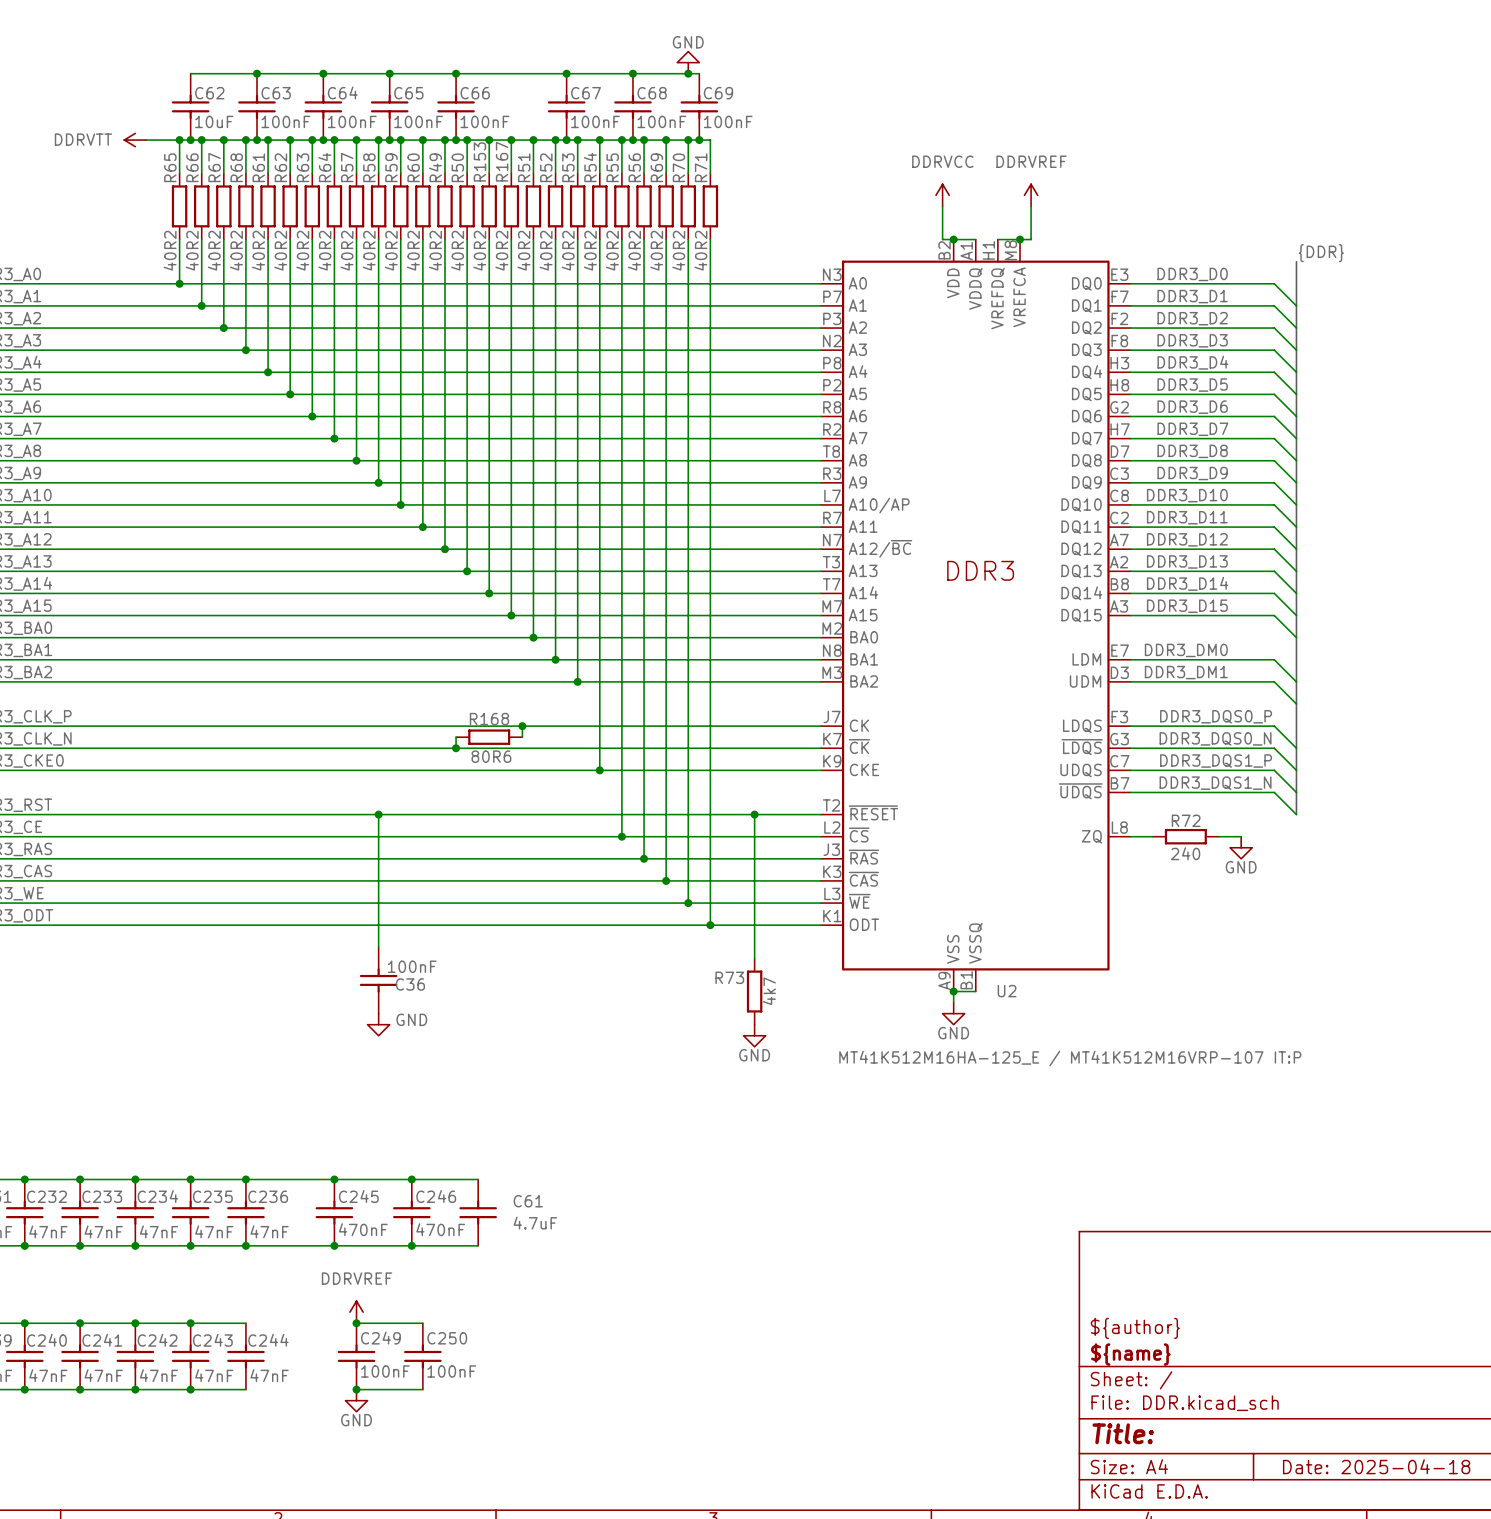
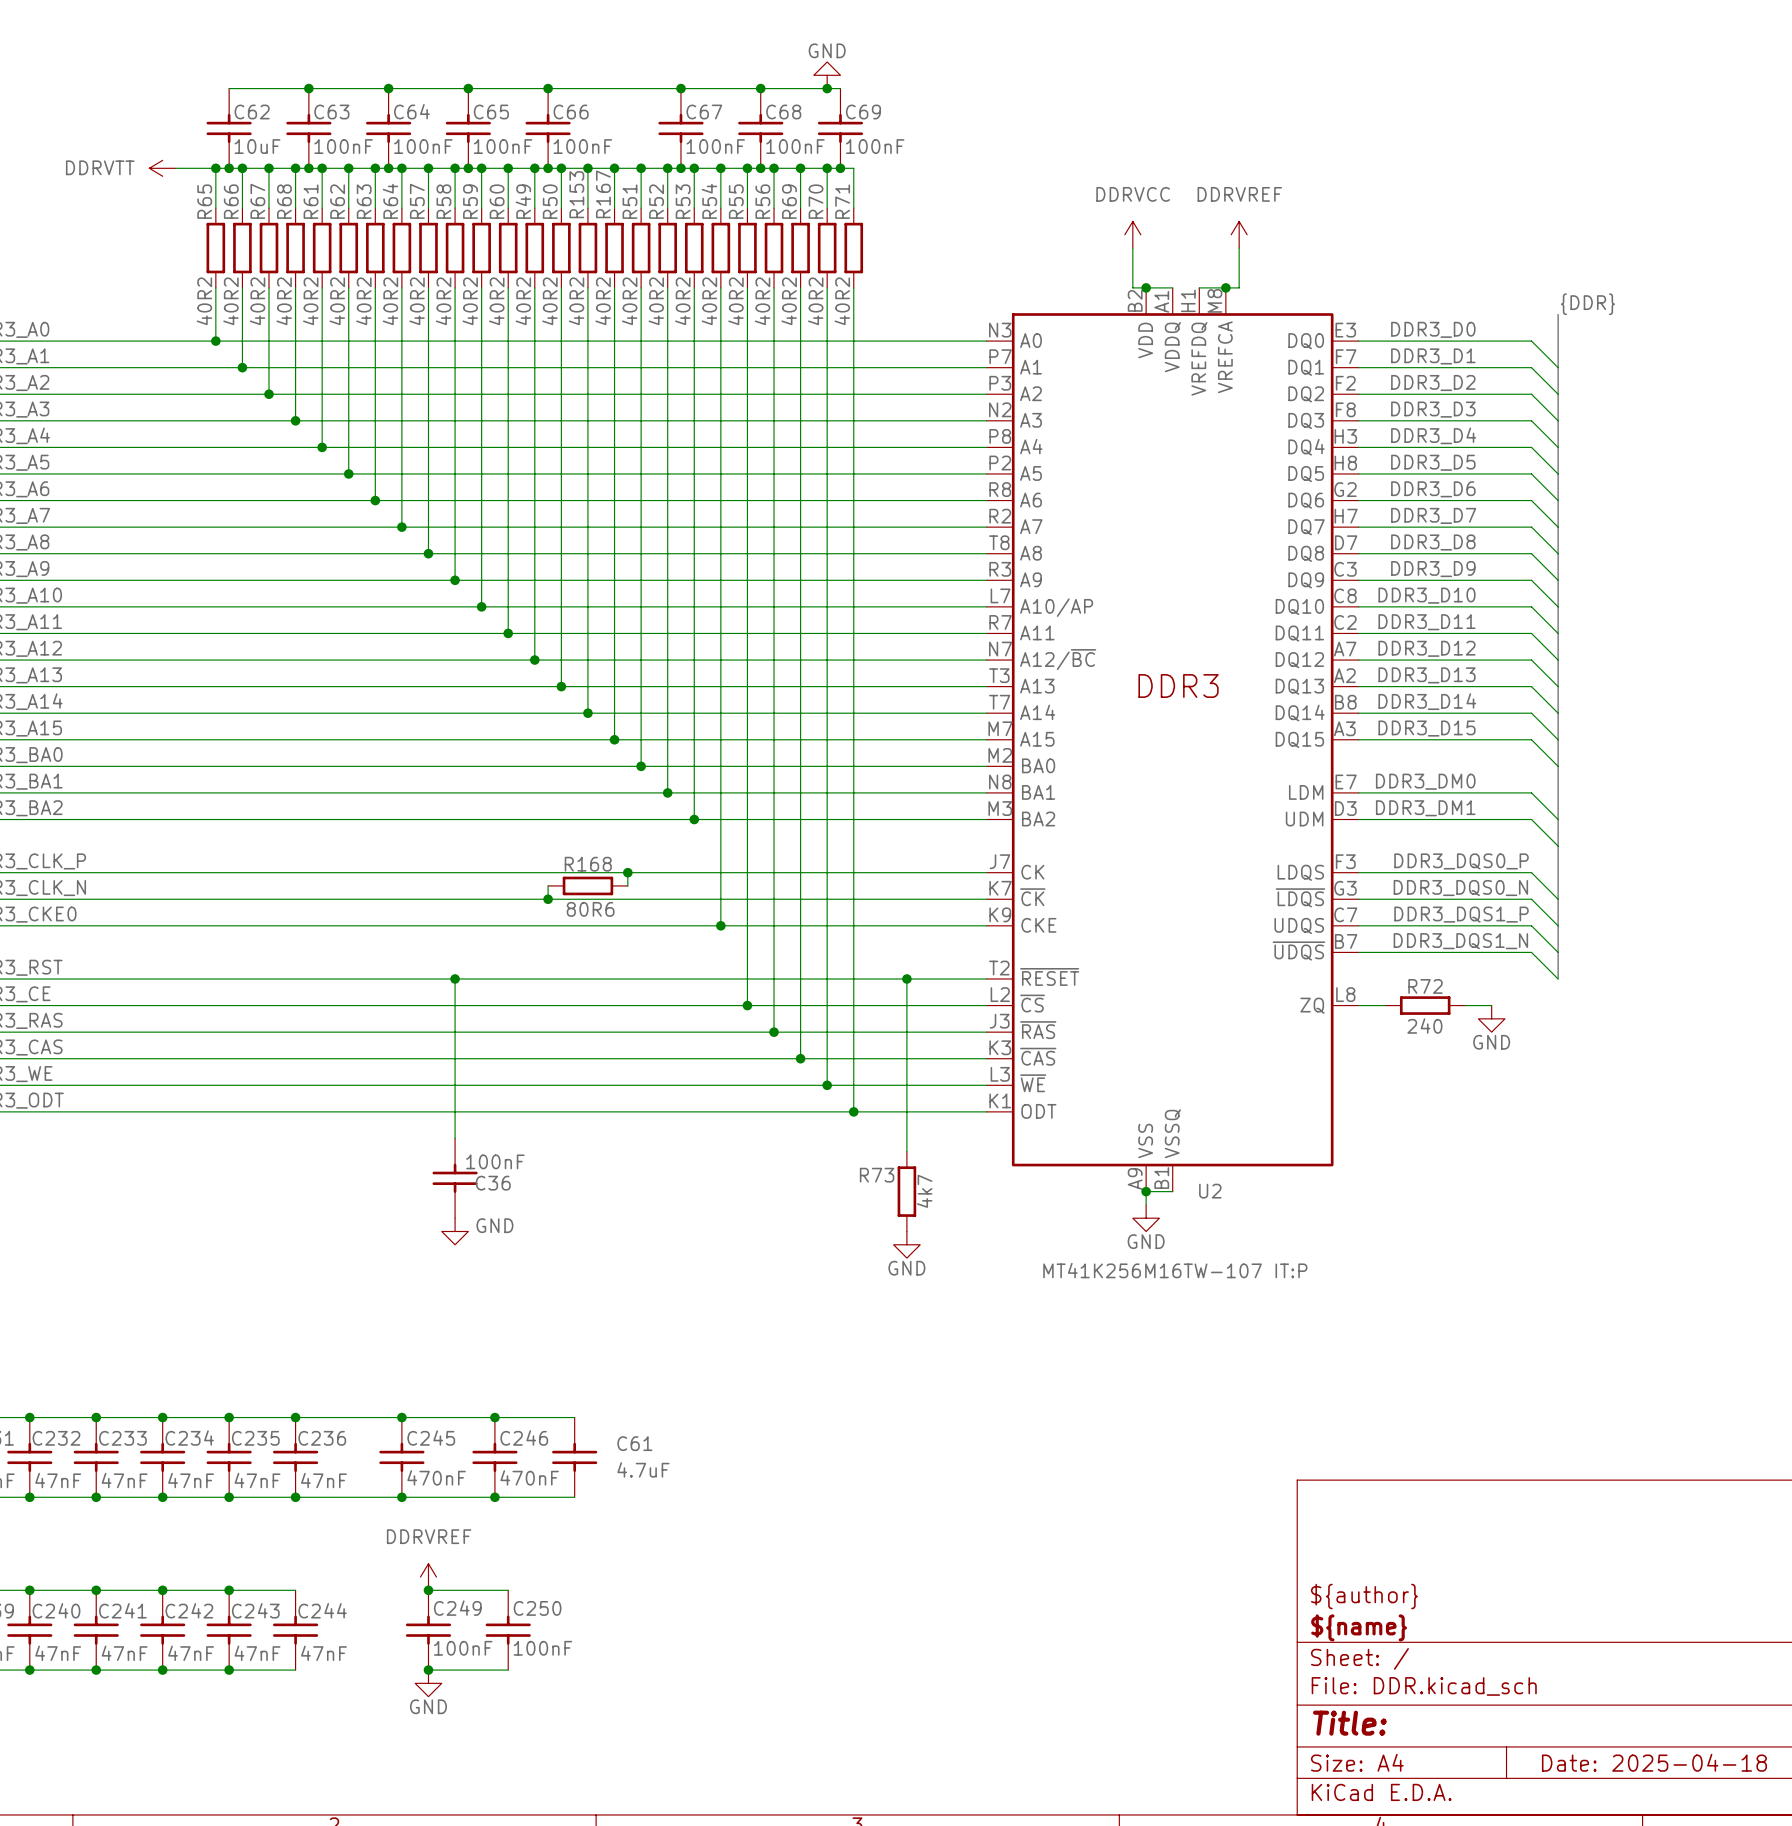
U2 value: MT41K512M16HA-125_E / MT41K512M16VRP-107 IT:P (1070, 1058) -> MT41K256M16TW-107 IT:P (1175, 1270)

